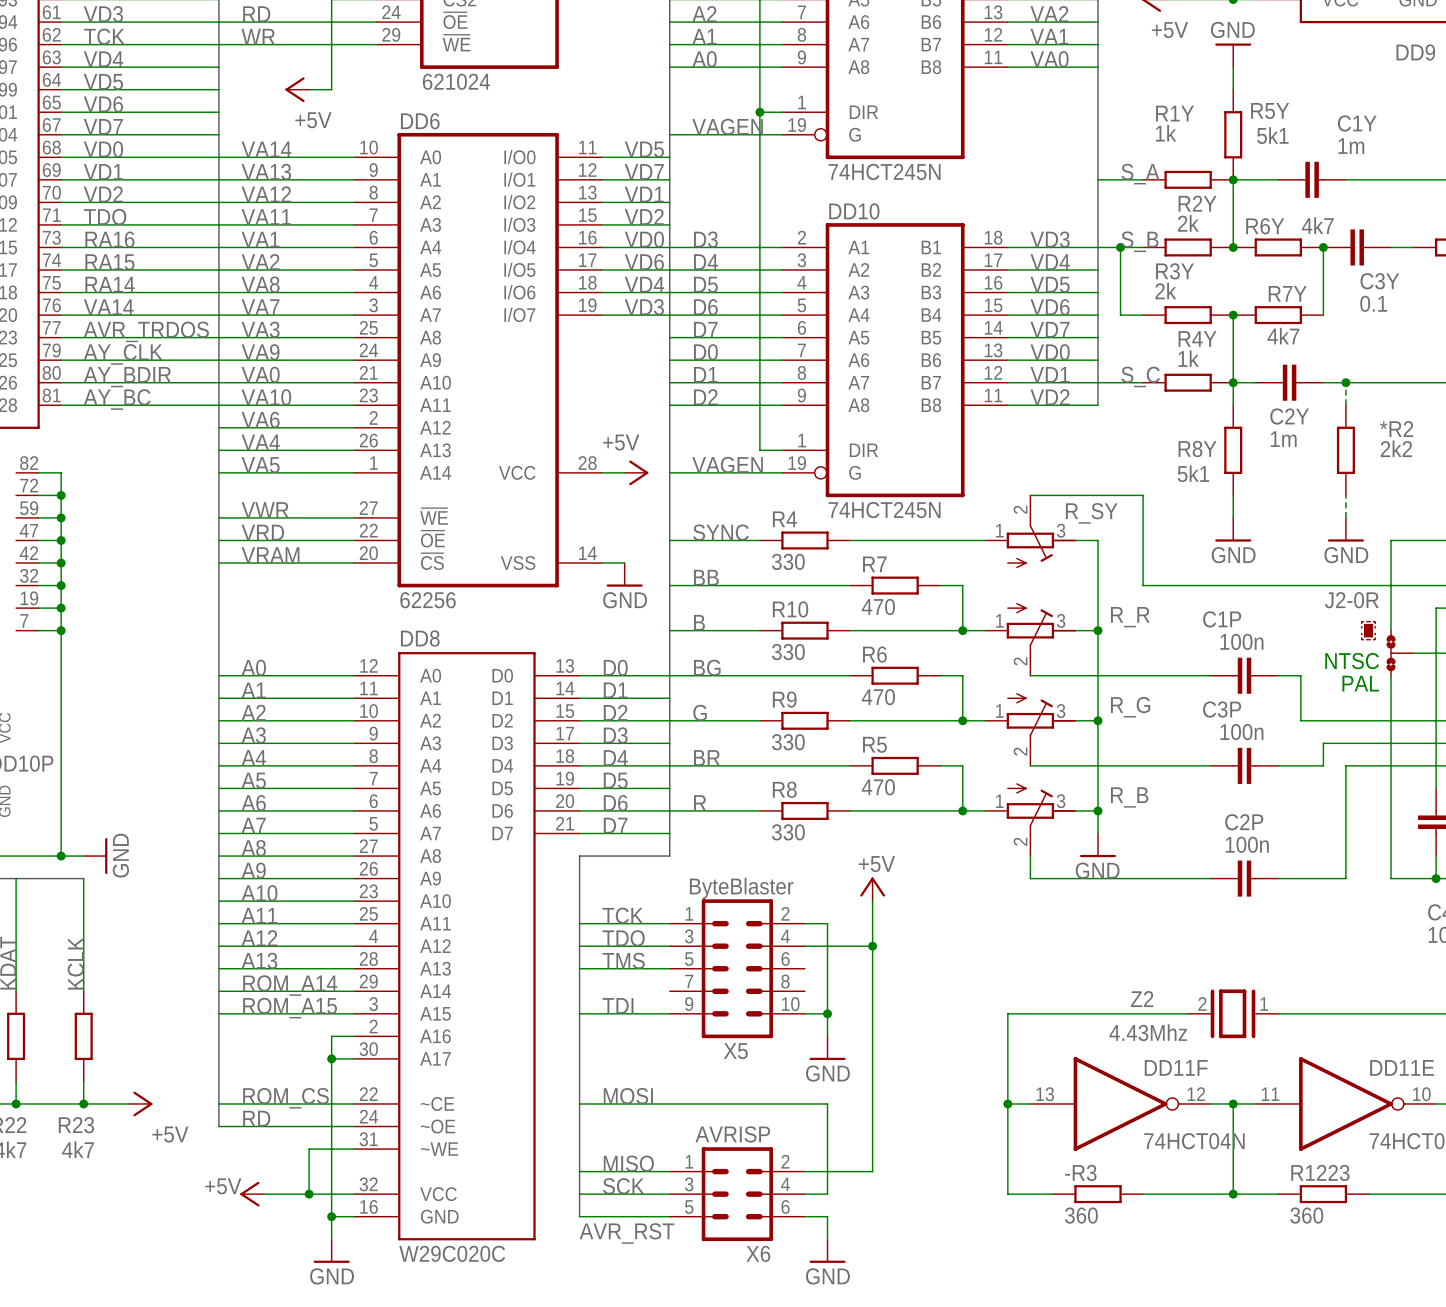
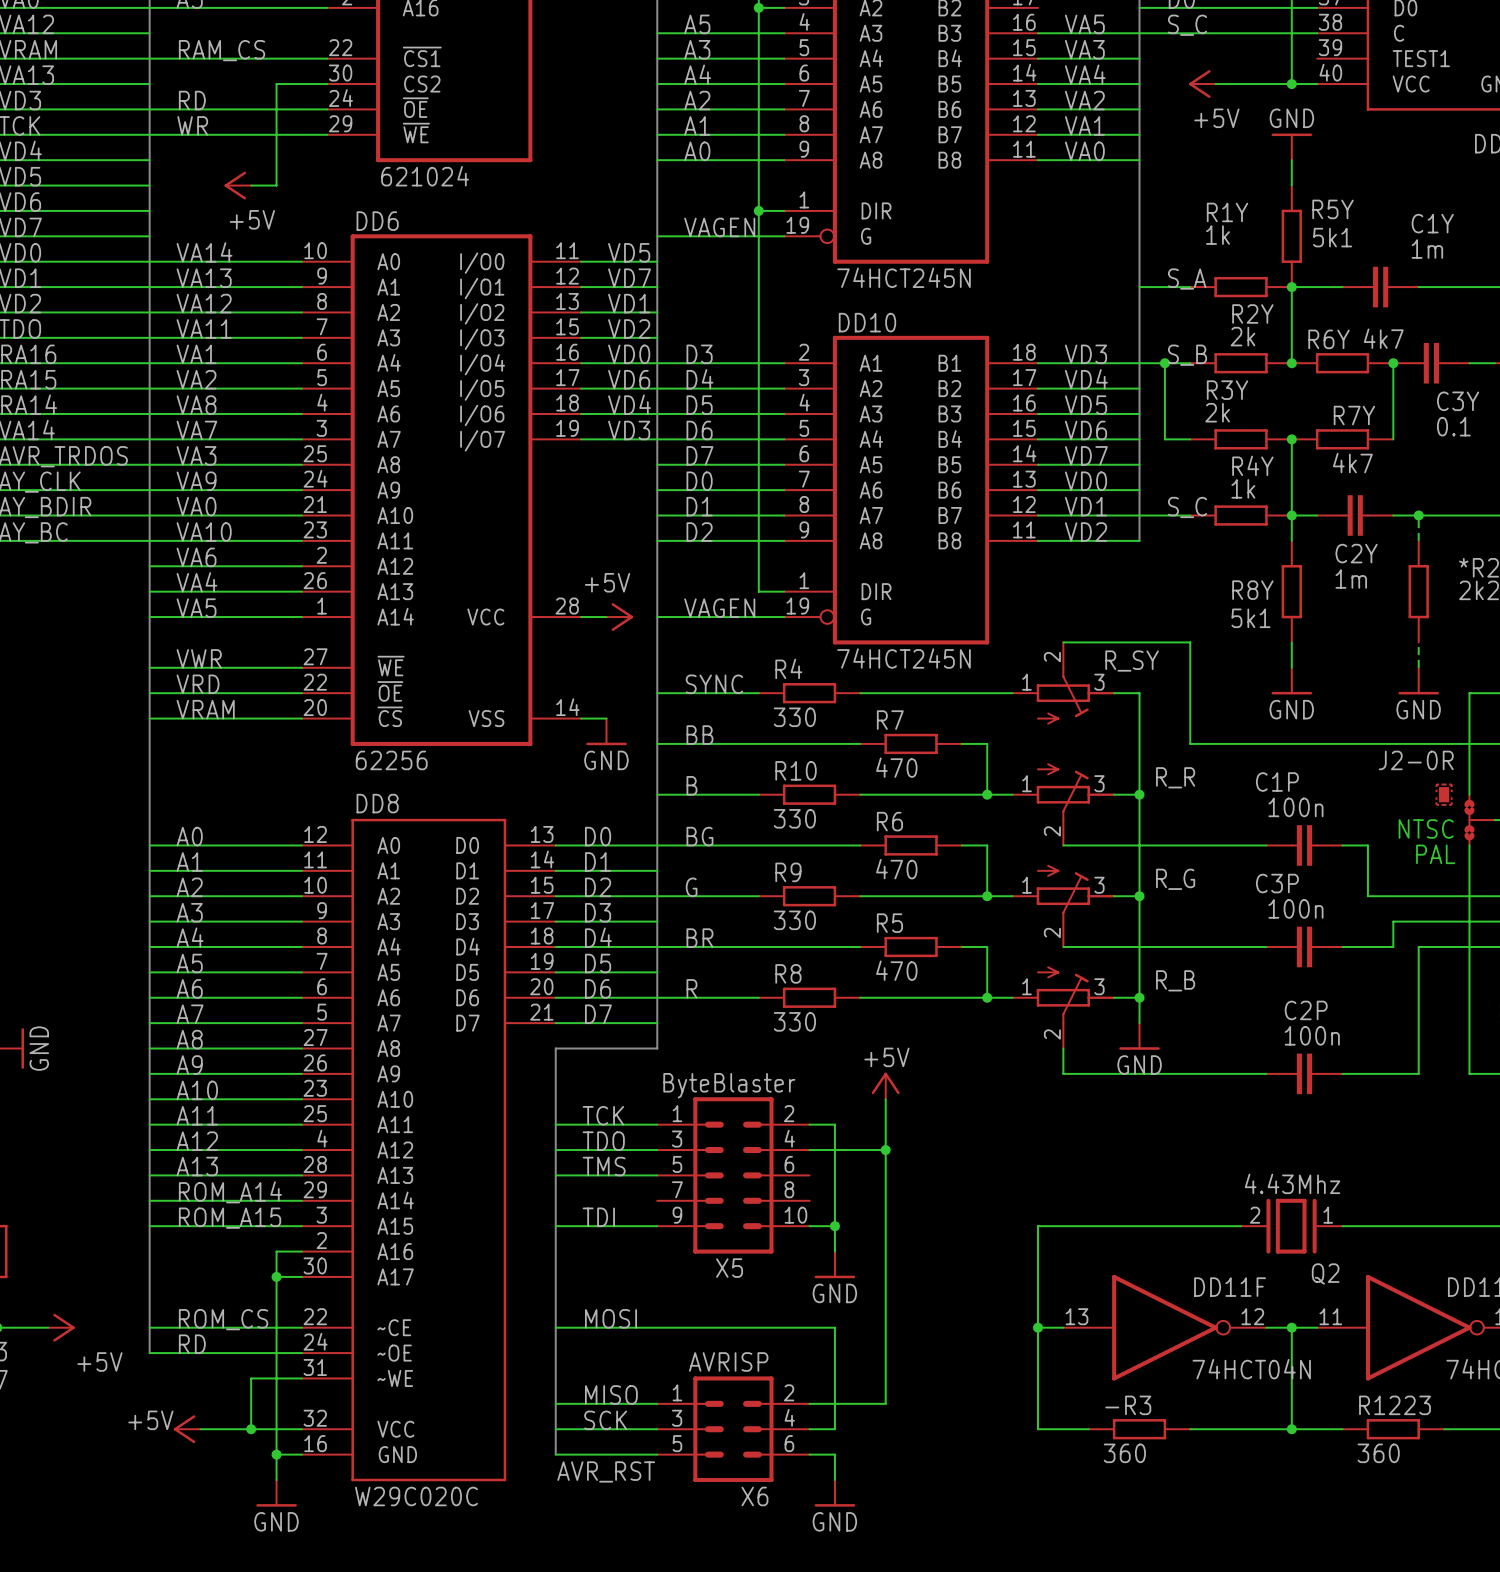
Z2 name: Z2 (1142, 999) -> Q2 (1325, 1273)
Z2 value position: 4.43Mhz (1148, 1032) -> 4.43Mhz (1292, 1183)

